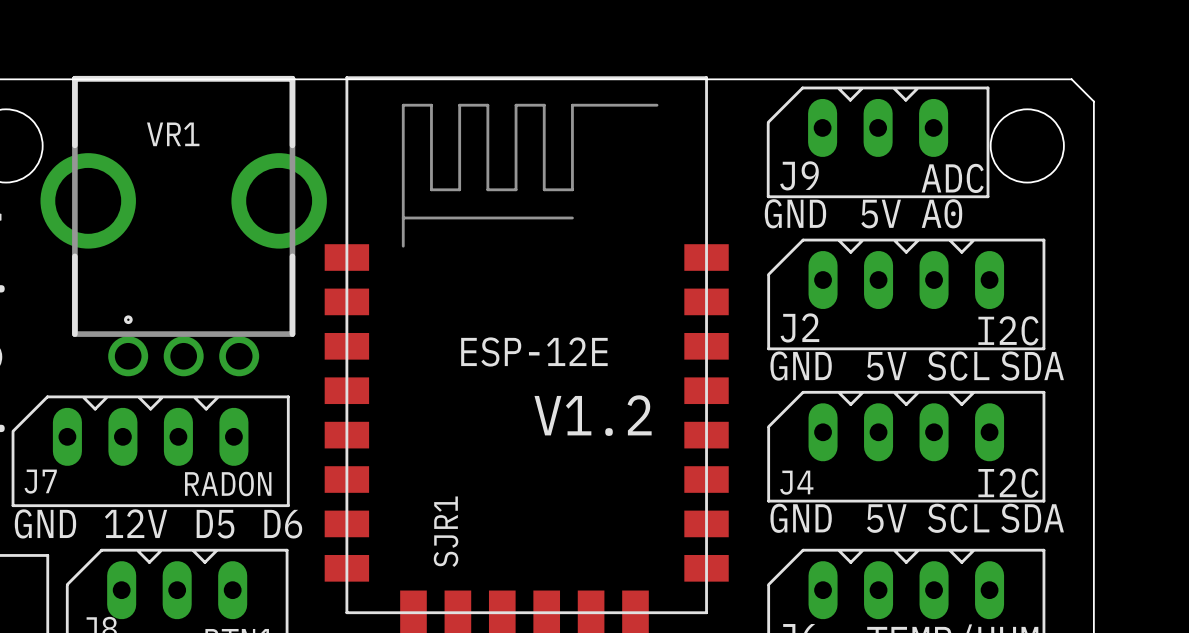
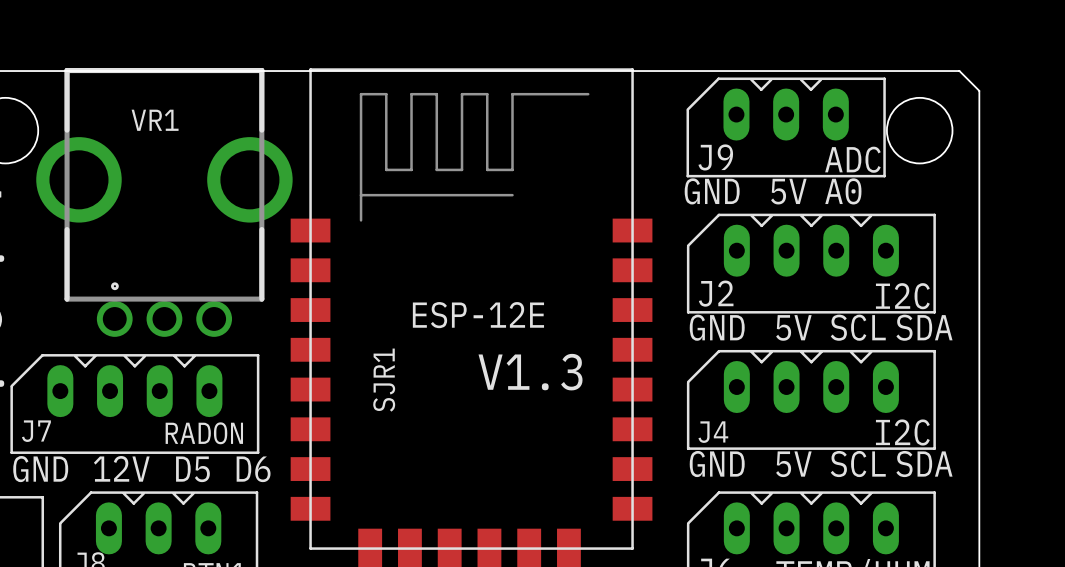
text: V1.2 (593, 415) -> V1.3 (530, 372)
SJR1 name position: SJR1 (446, 531) -> SJR1 (384, 380)

